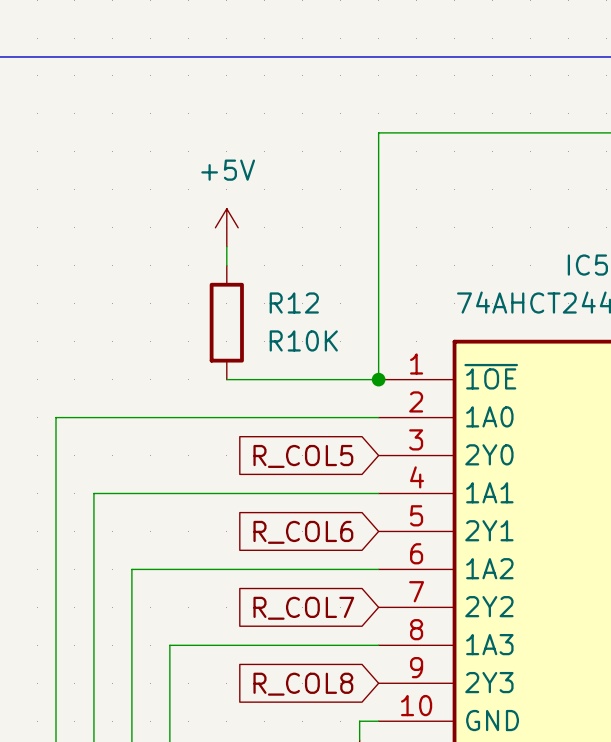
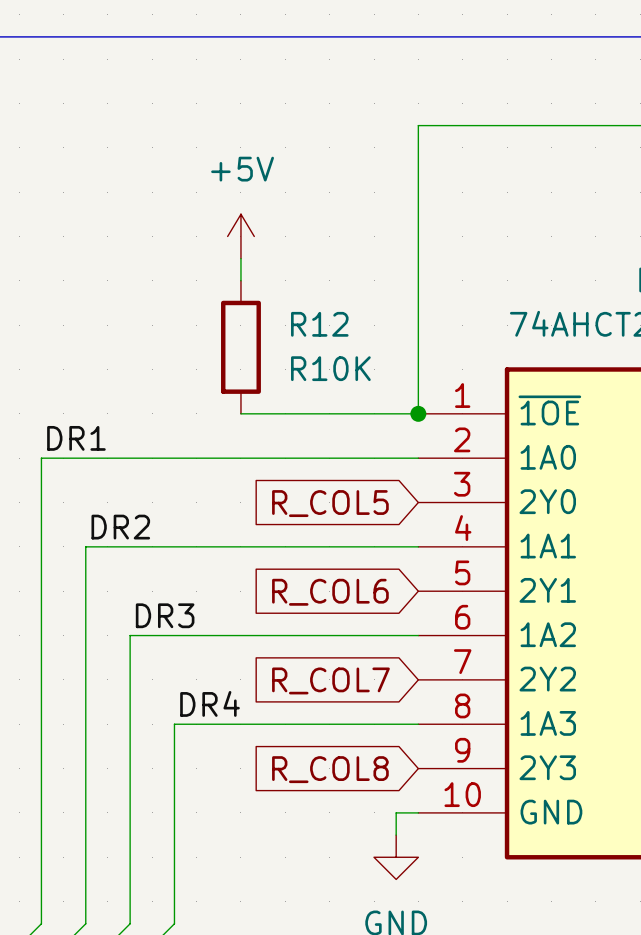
label: none -> DR1 (76, 438)
label: none -> DR2 (120, 527)
label: none -> DR3 (165, 615)
label: none -> DR4 (210, 703)

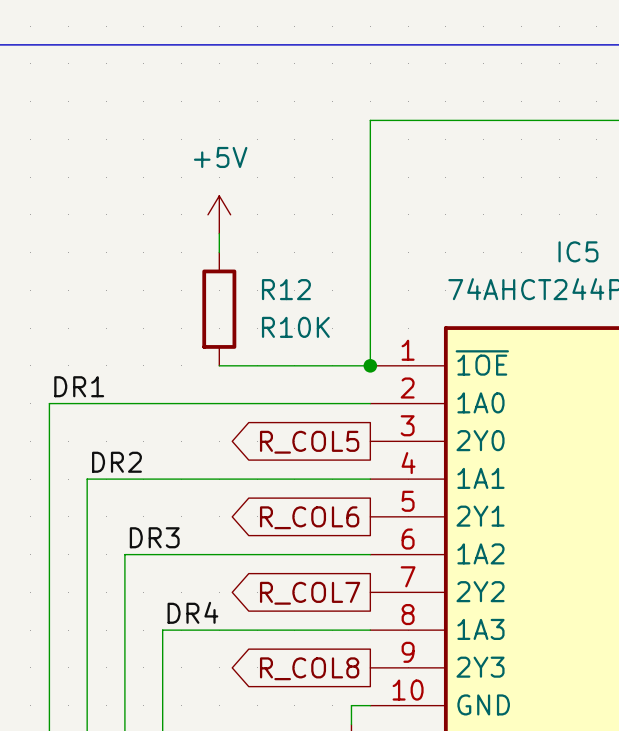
global label shape: input (330, 503) -> output (309, 442)
global label shape: input (330, 592) -> output (309, 517)
global label shape: input (330, 680) -> output (310, 593)
global label shape: input (330, 769) -> output (309, 668)

